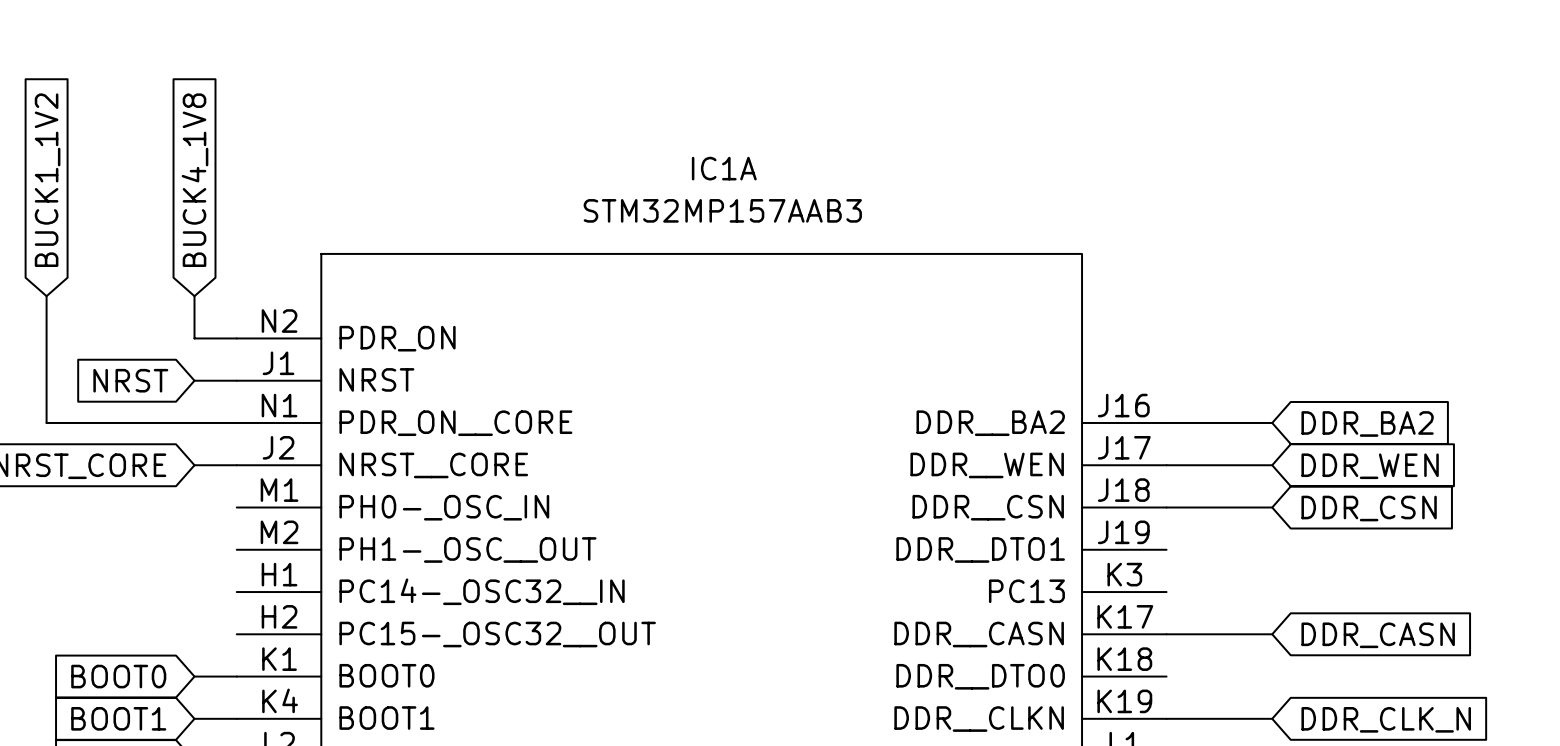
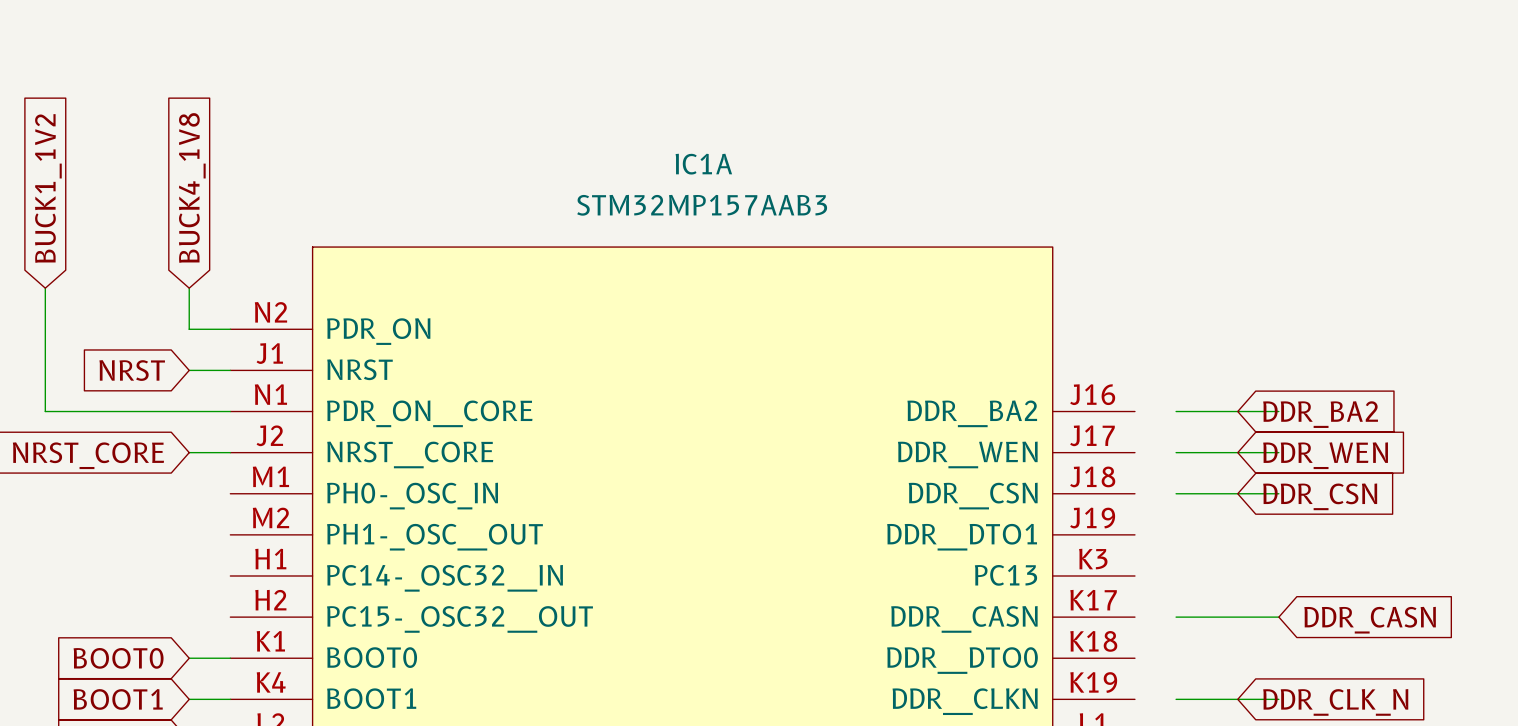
wire: (1166, 422) (1208, 422) -> (1237, 411) (1278, 411)
wire: (1166, 465) (1208, 465) -> (1237, 452) (1278, 452)
wire: (1166, 507) (1208, 507) -> (1237, 493) (1278, 493)
wire: (1166, 634) (1208, 634) -> (1237, 617) (1278, 617)
global label position: DDR_CASN (1378, 635) -> DDR_CASN (1370, 620)
wire: (1166, 718) (1208, 718) -> (1237, 699) (1278, 699)

